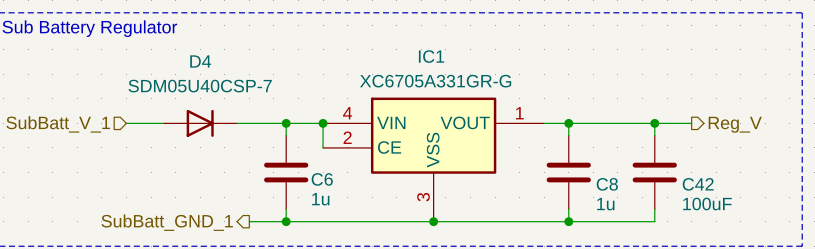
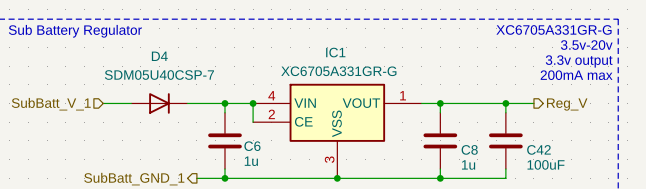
text: none -> XC6705A331GR-G (554, 29)
text: none -> 3.5v-20v (586, 45)
text: none -> 3.3v output (579, 61)
text: none -> 200mA max (576, 75)

